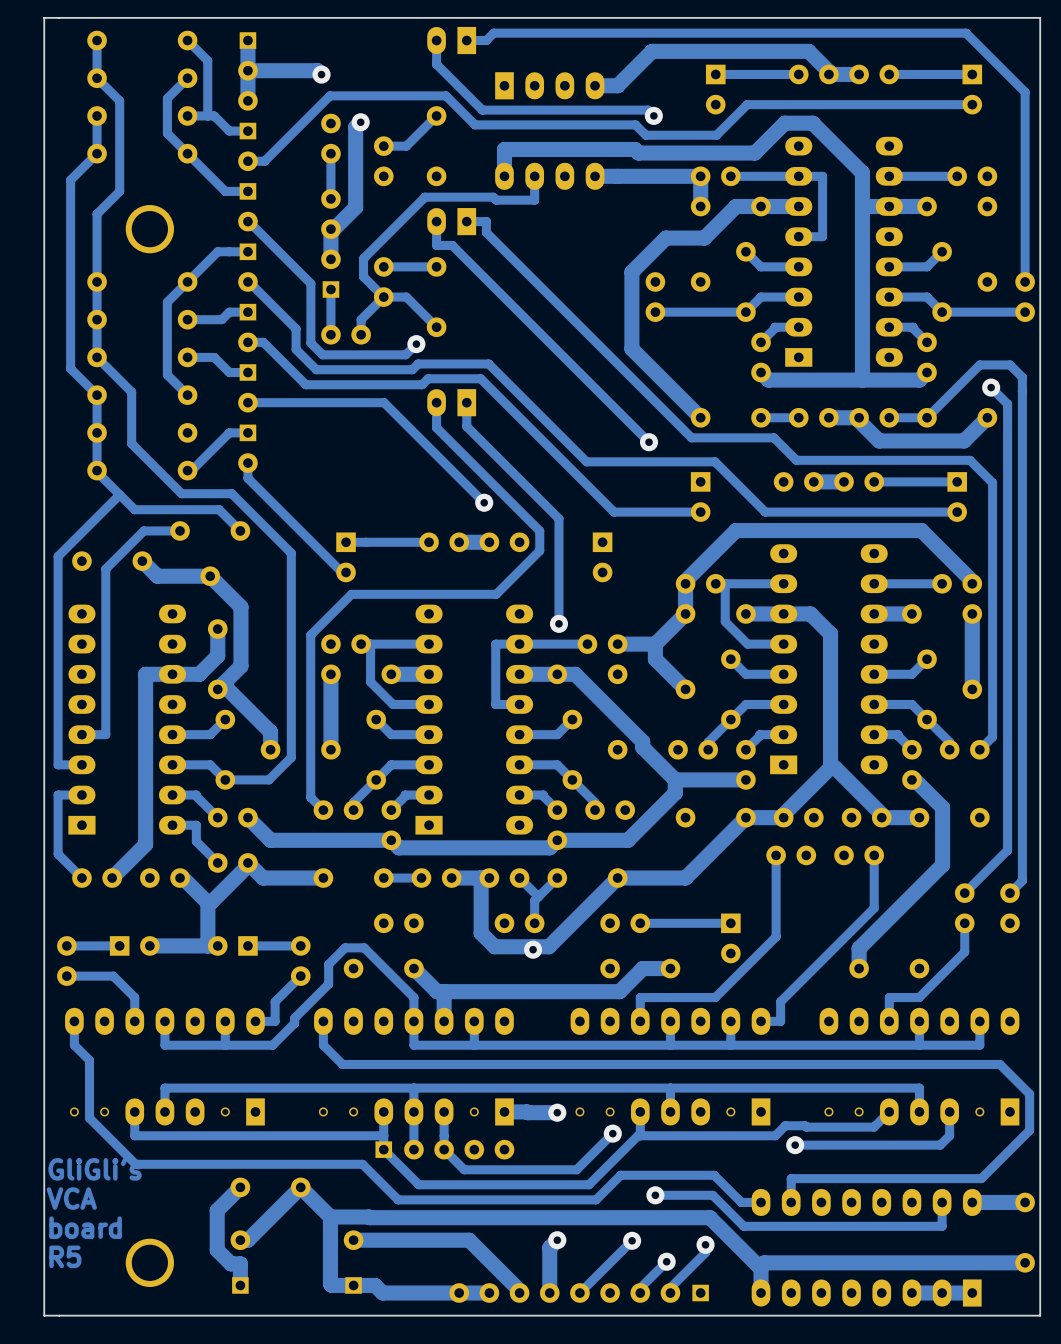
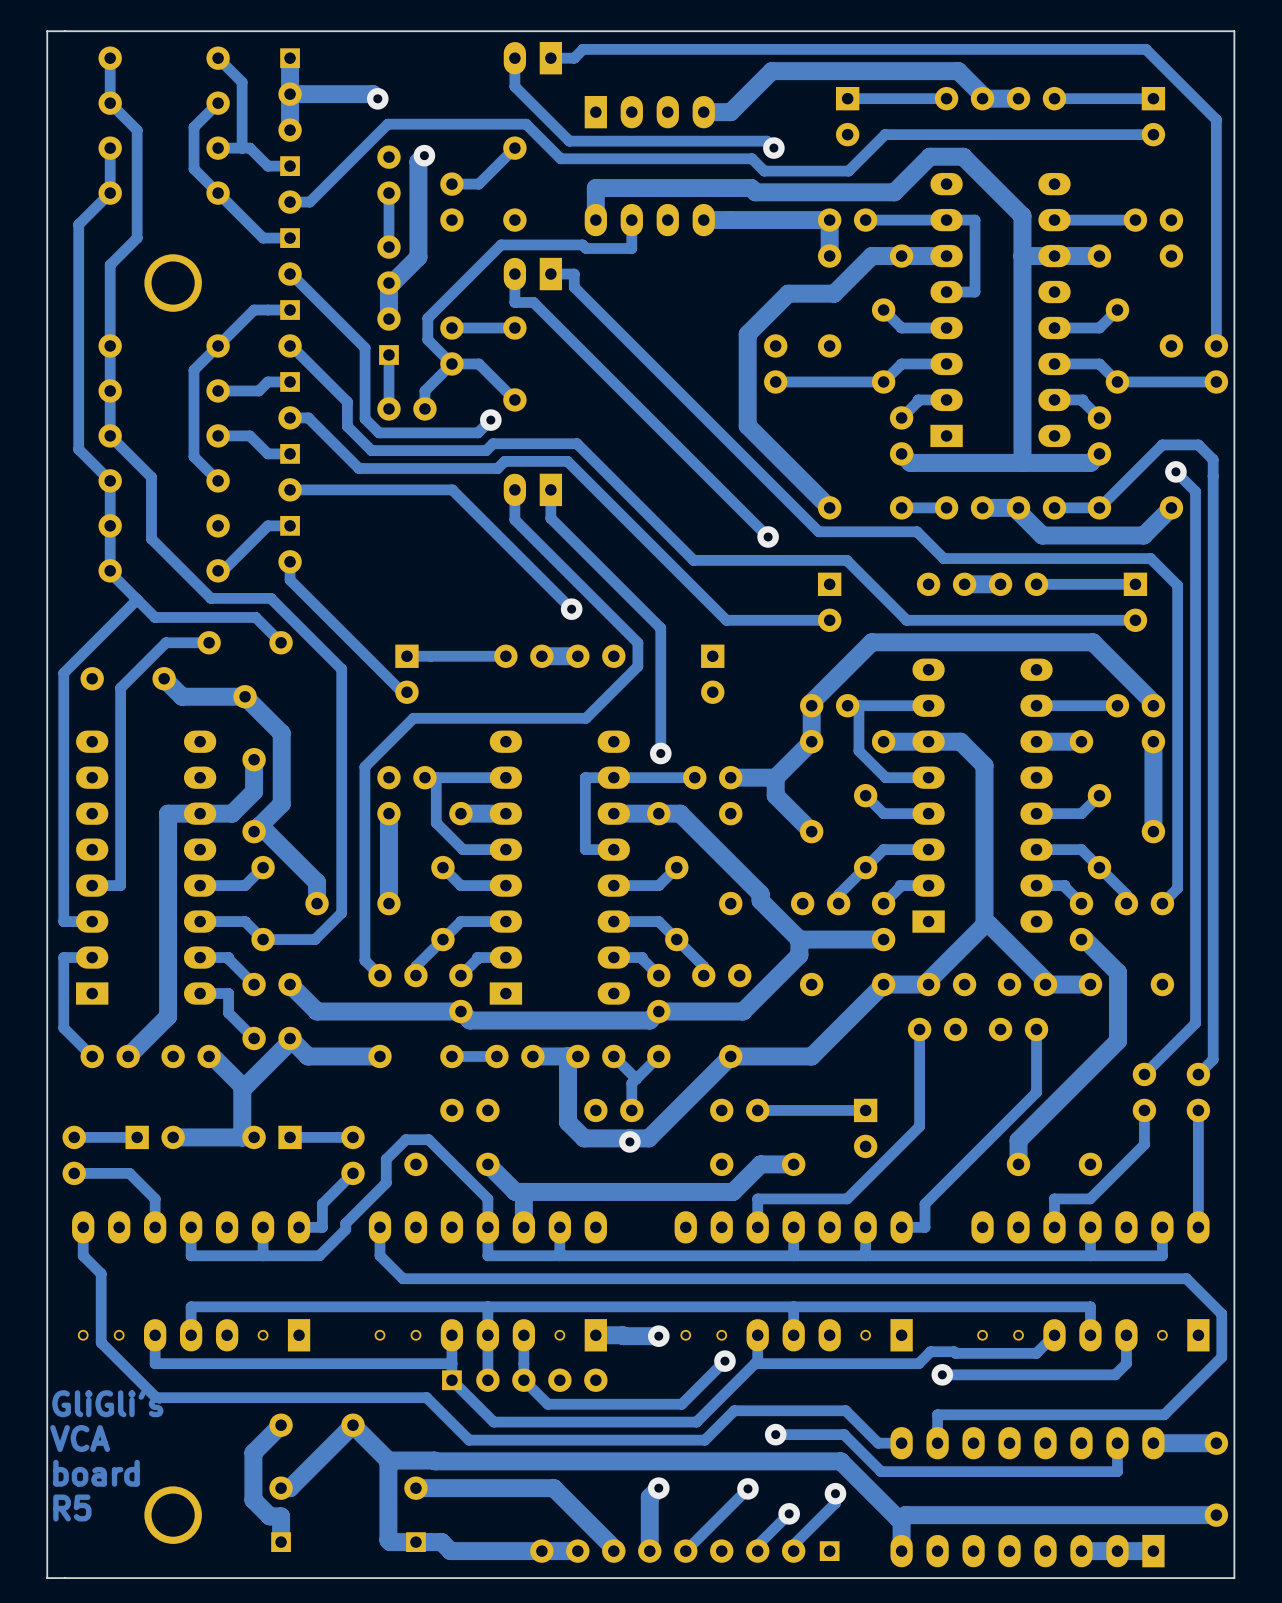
track: none -> (1198, 1110) (1198, 1227)

